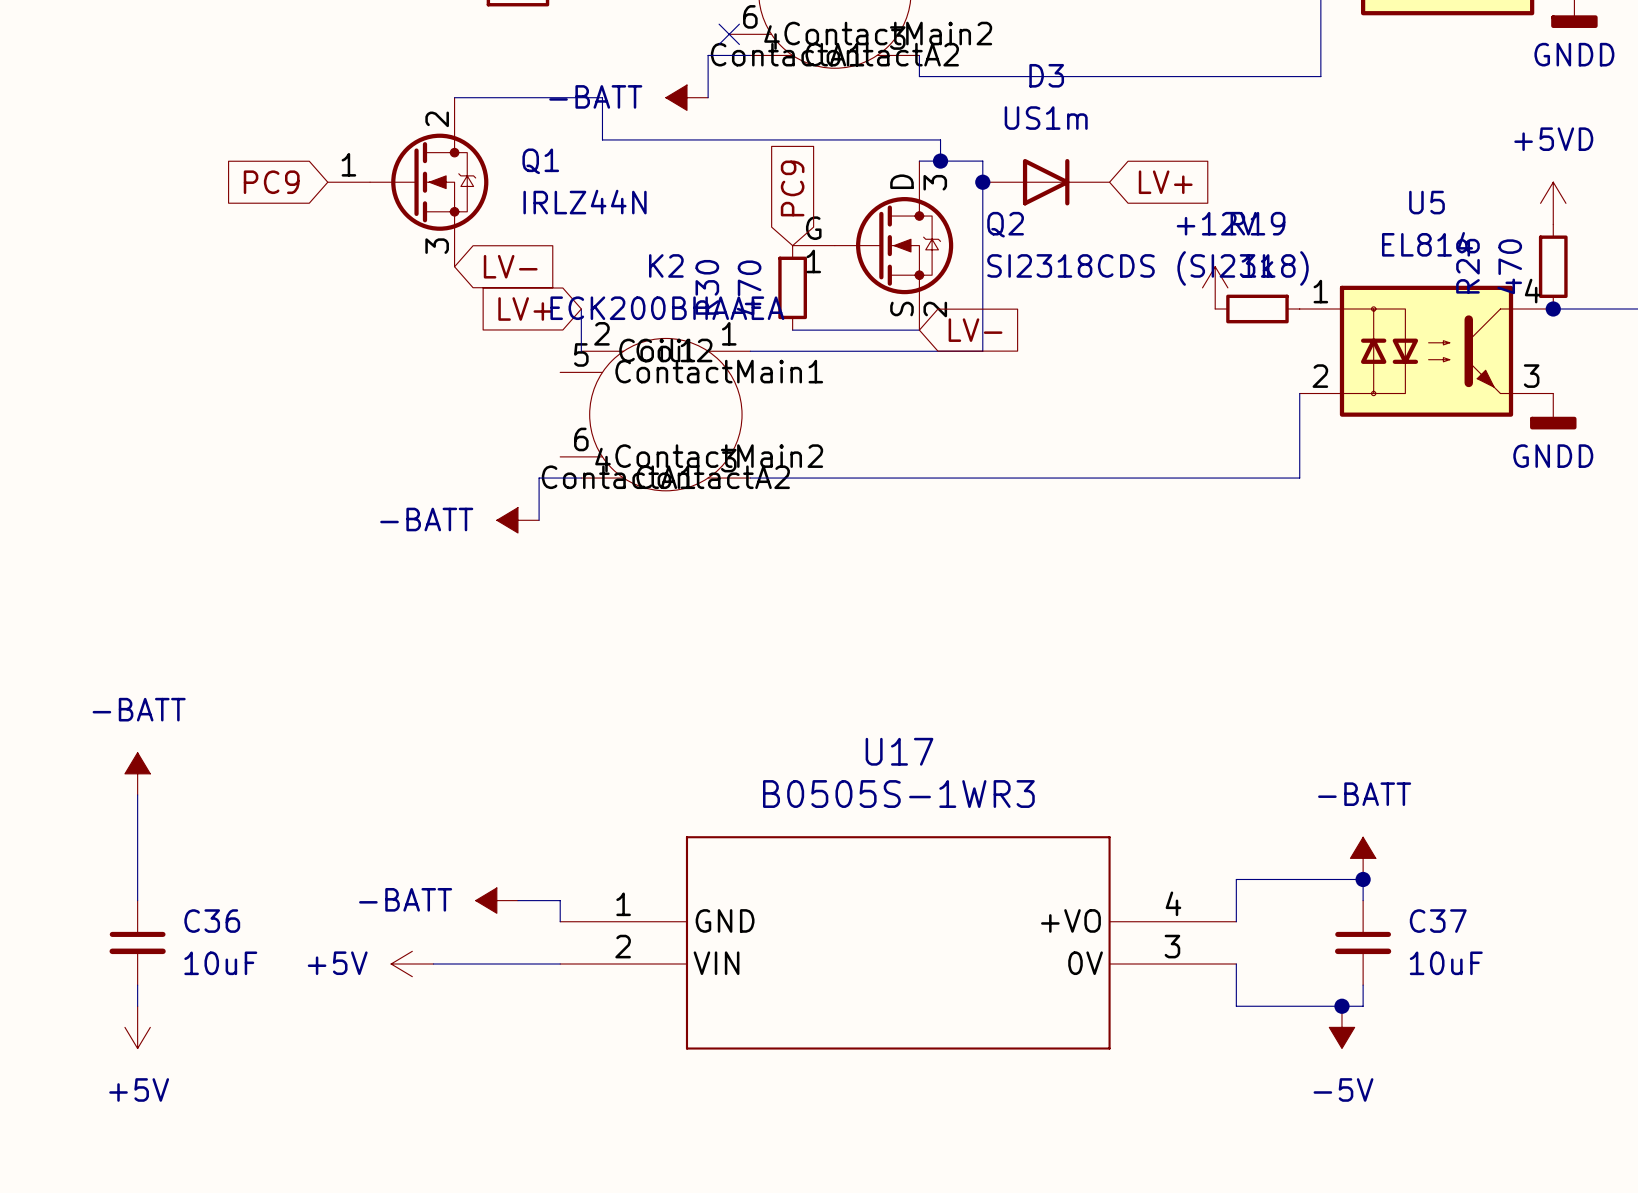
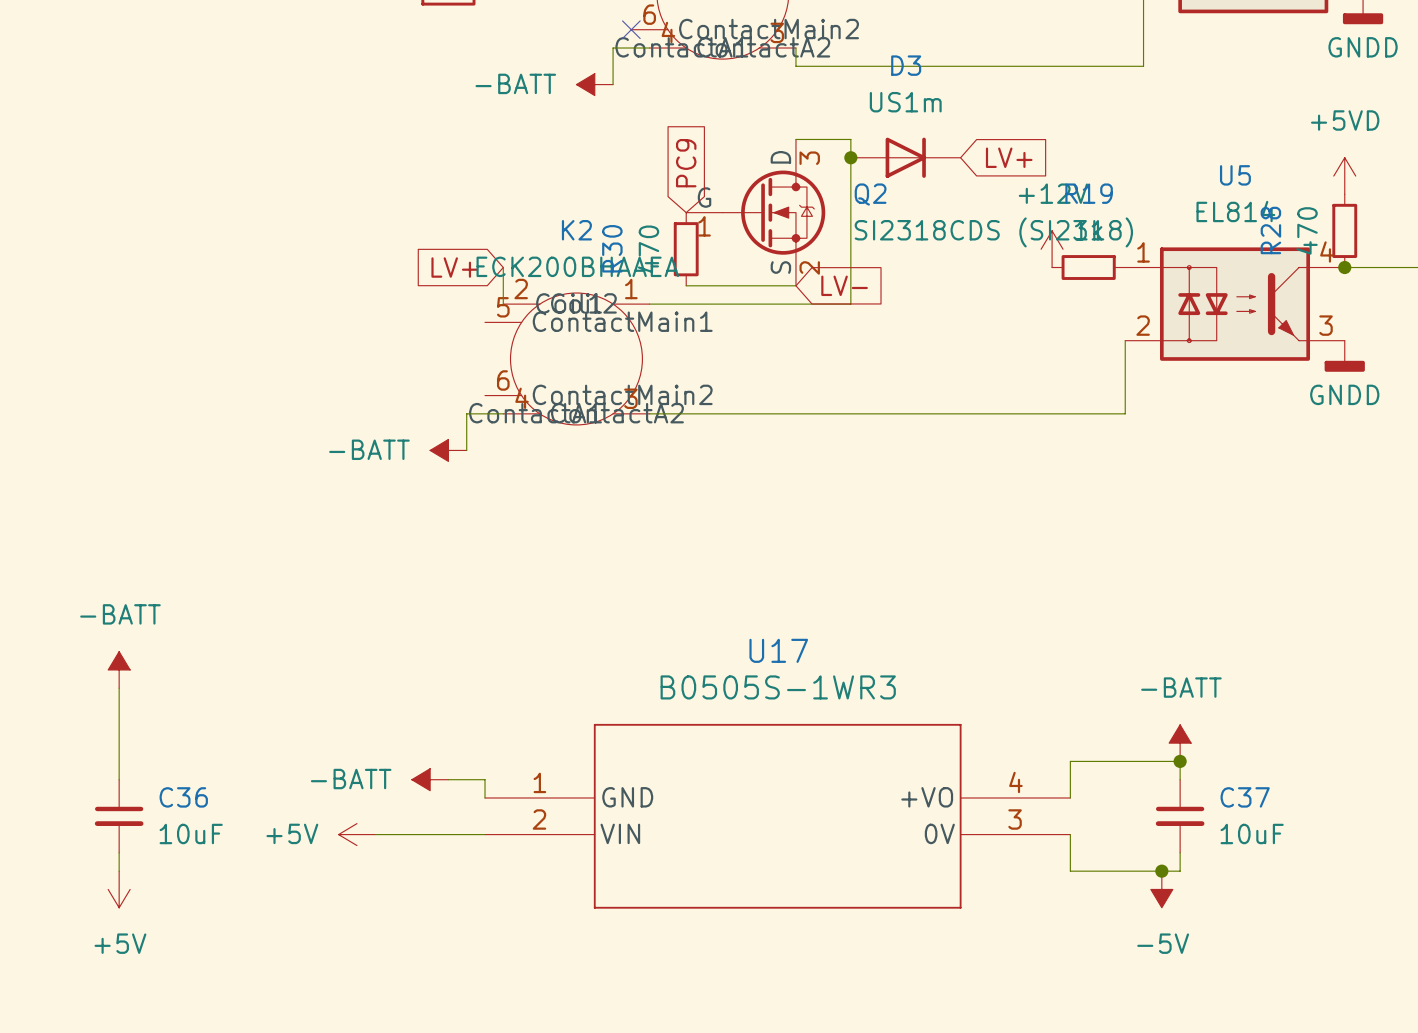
wire: (454, 97) (602, 97) (602, 139) (940, 139) (940, 161) -> none
junction: (940, 161) -> none
global label: PC9 (271, 182) -> none
Q1: IRLZ44N (408, 182) -> none
global label: LV- (510, 266) -> none

